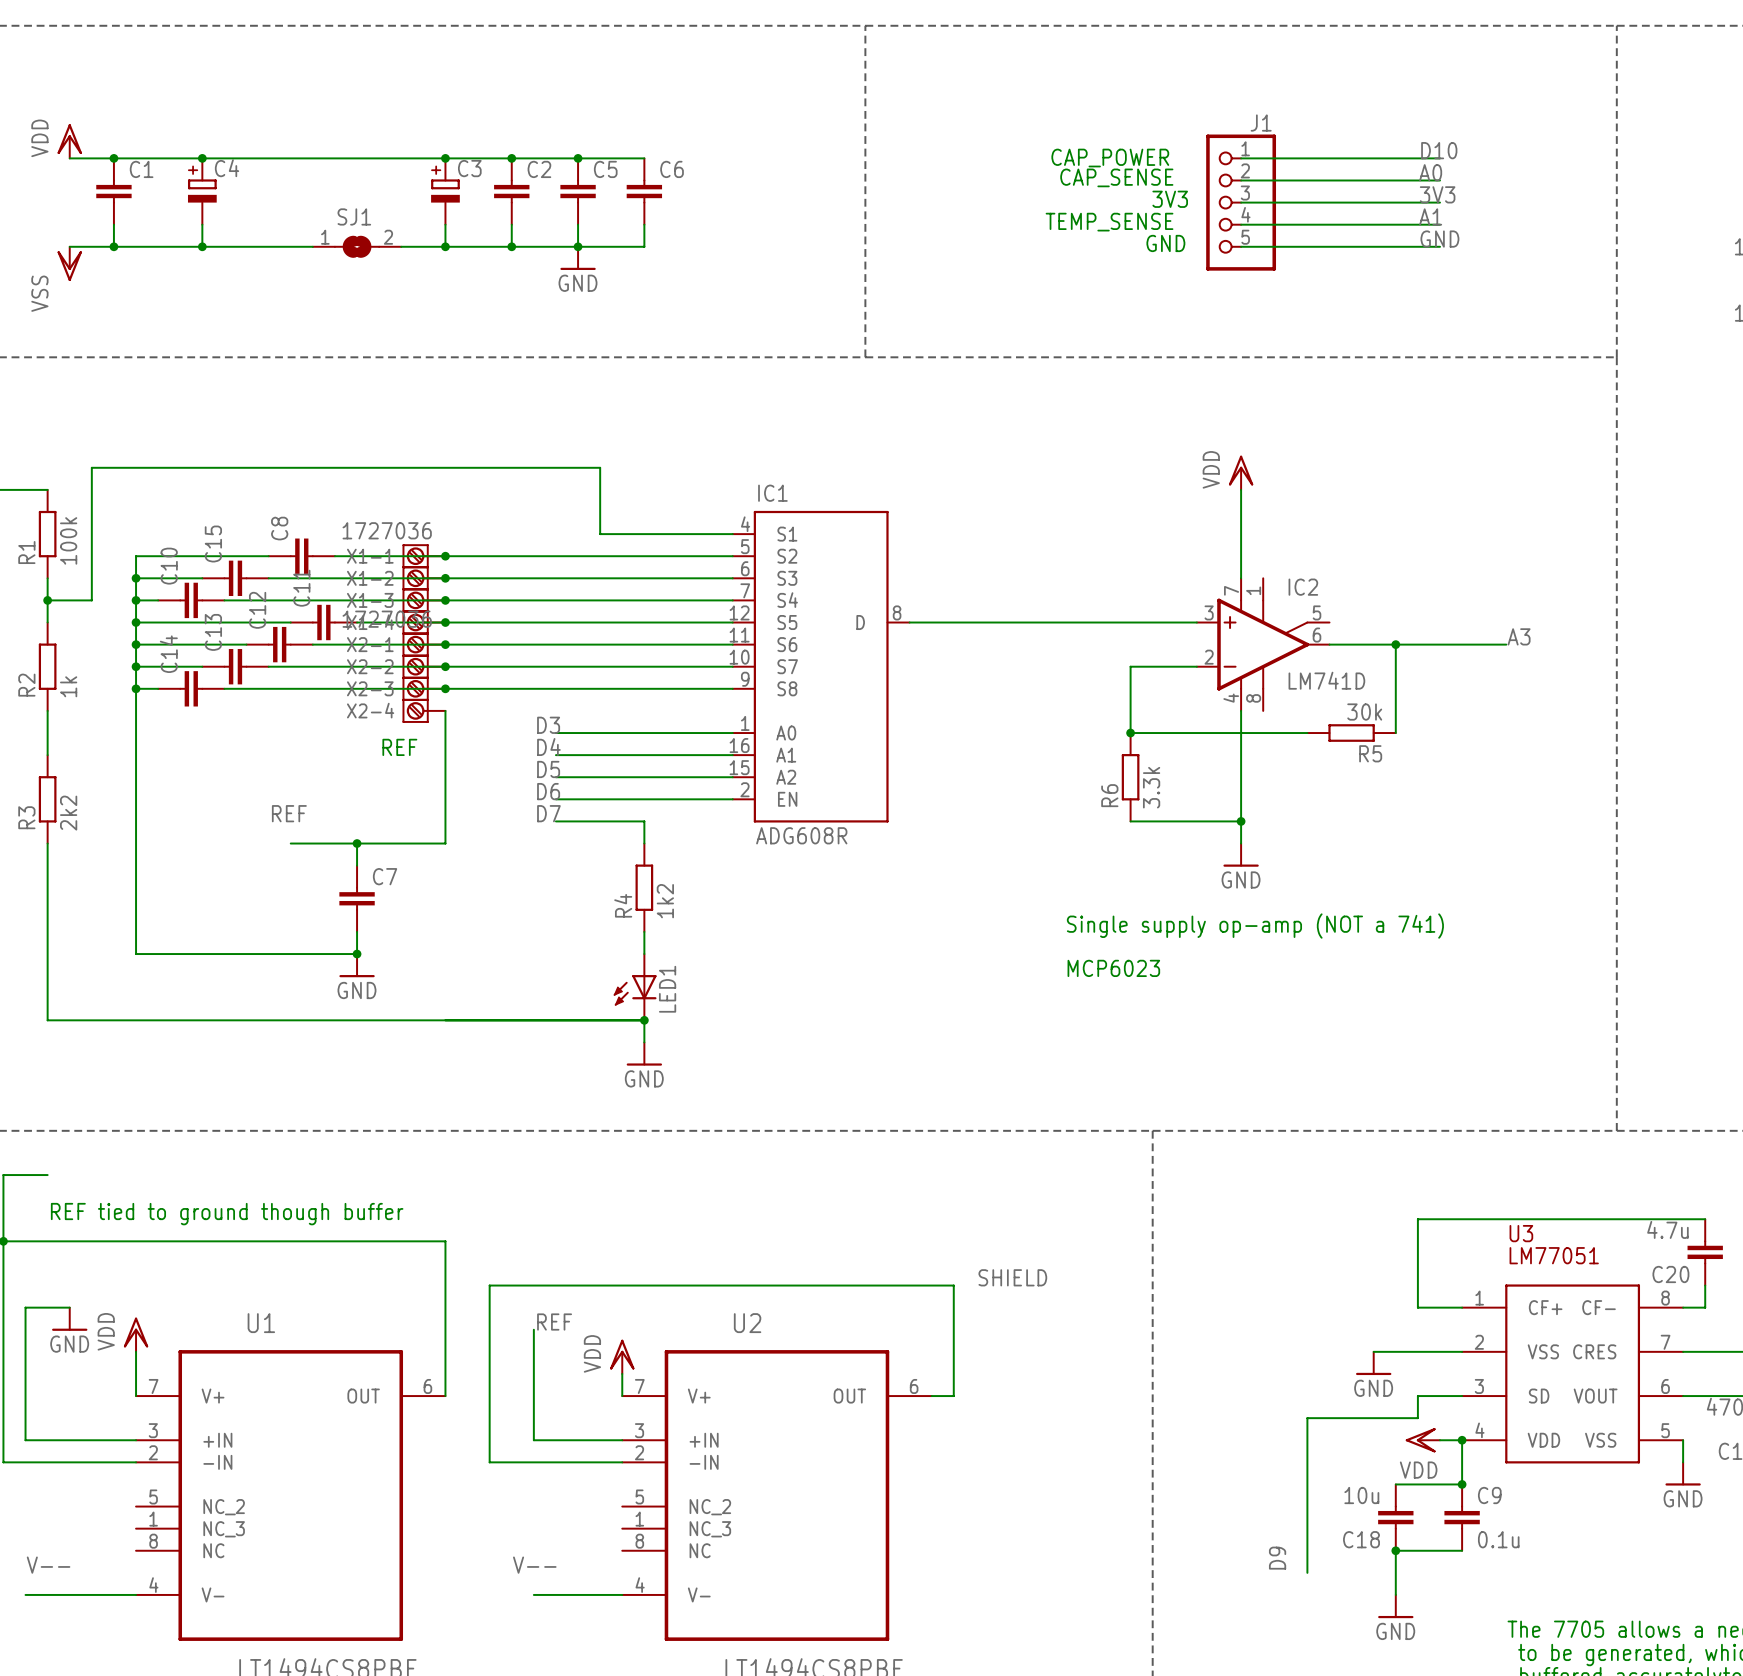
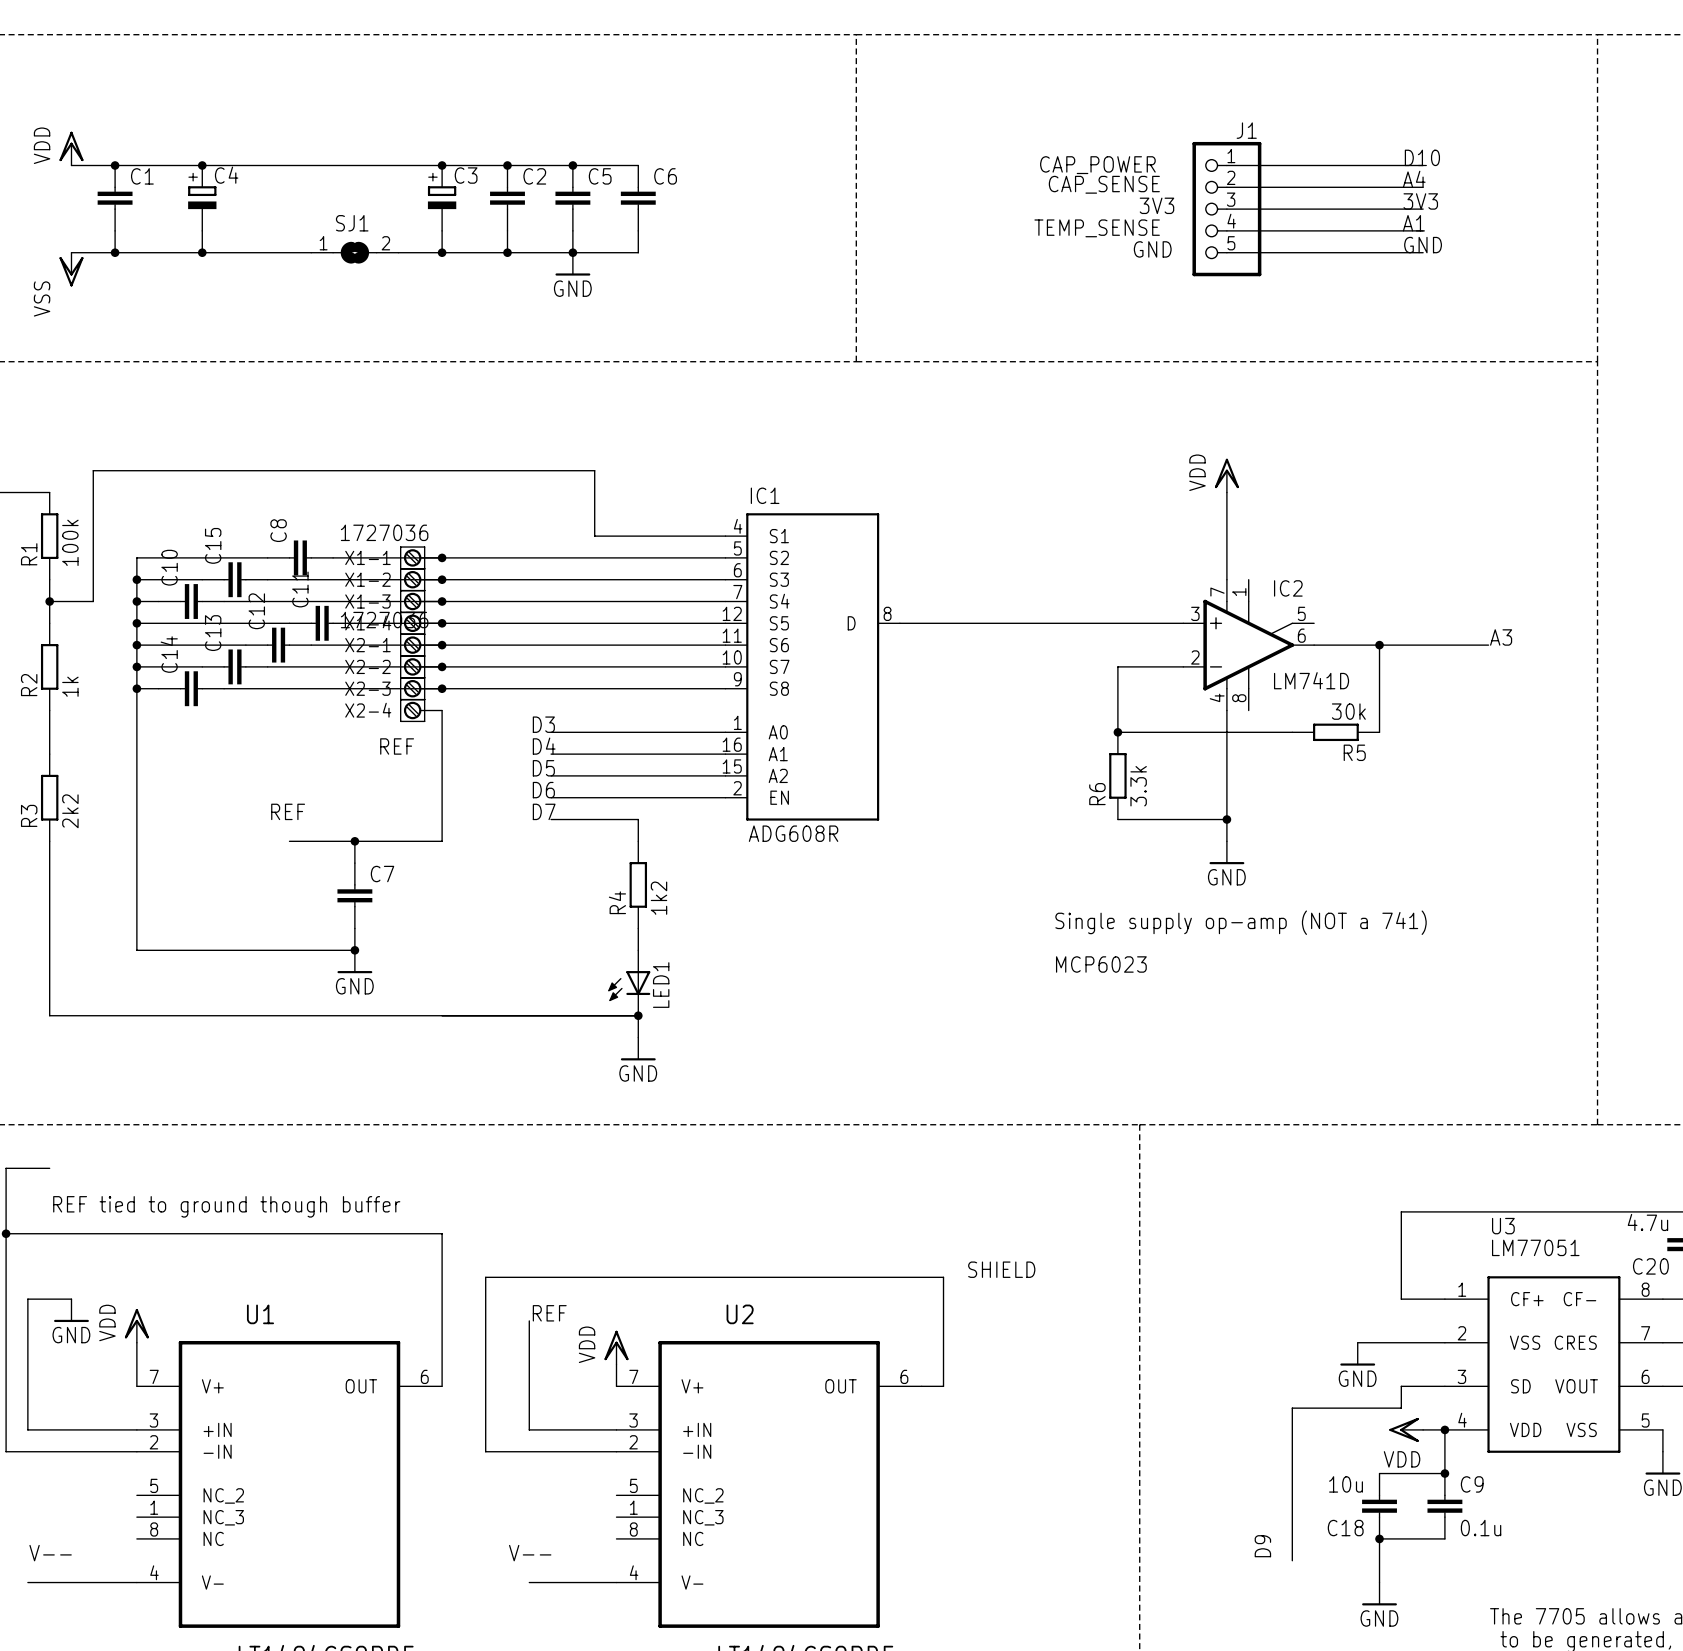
label: A0 (1430, 172) -> A4 (1414, 179)

